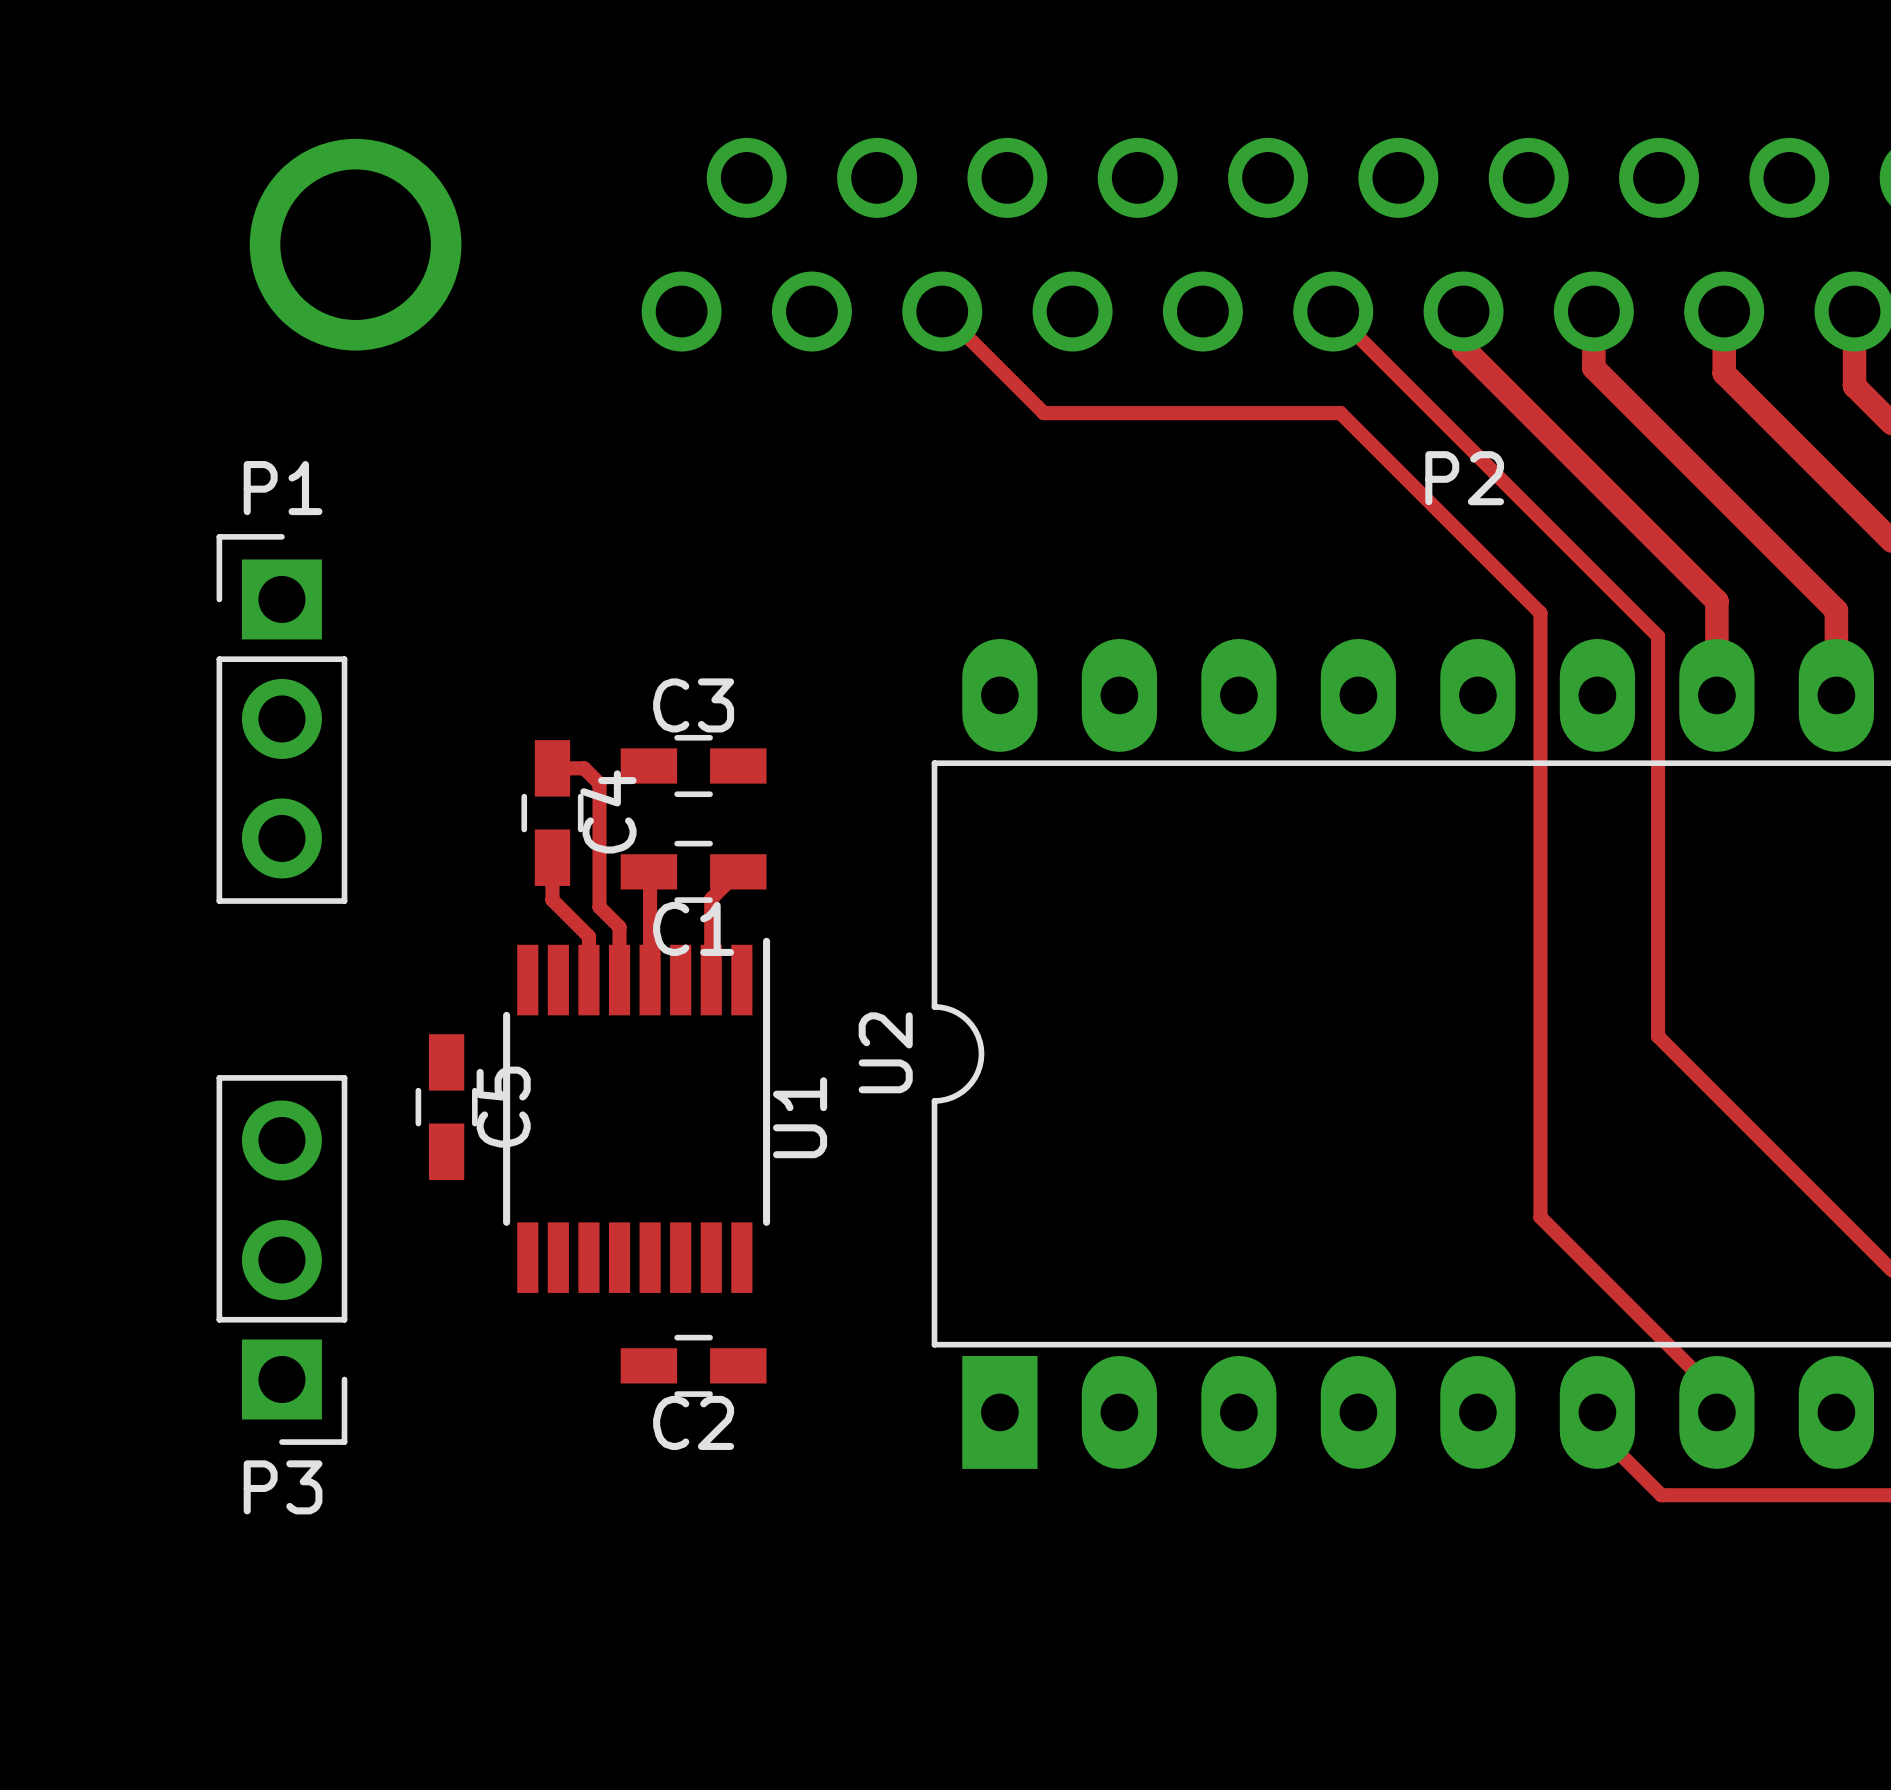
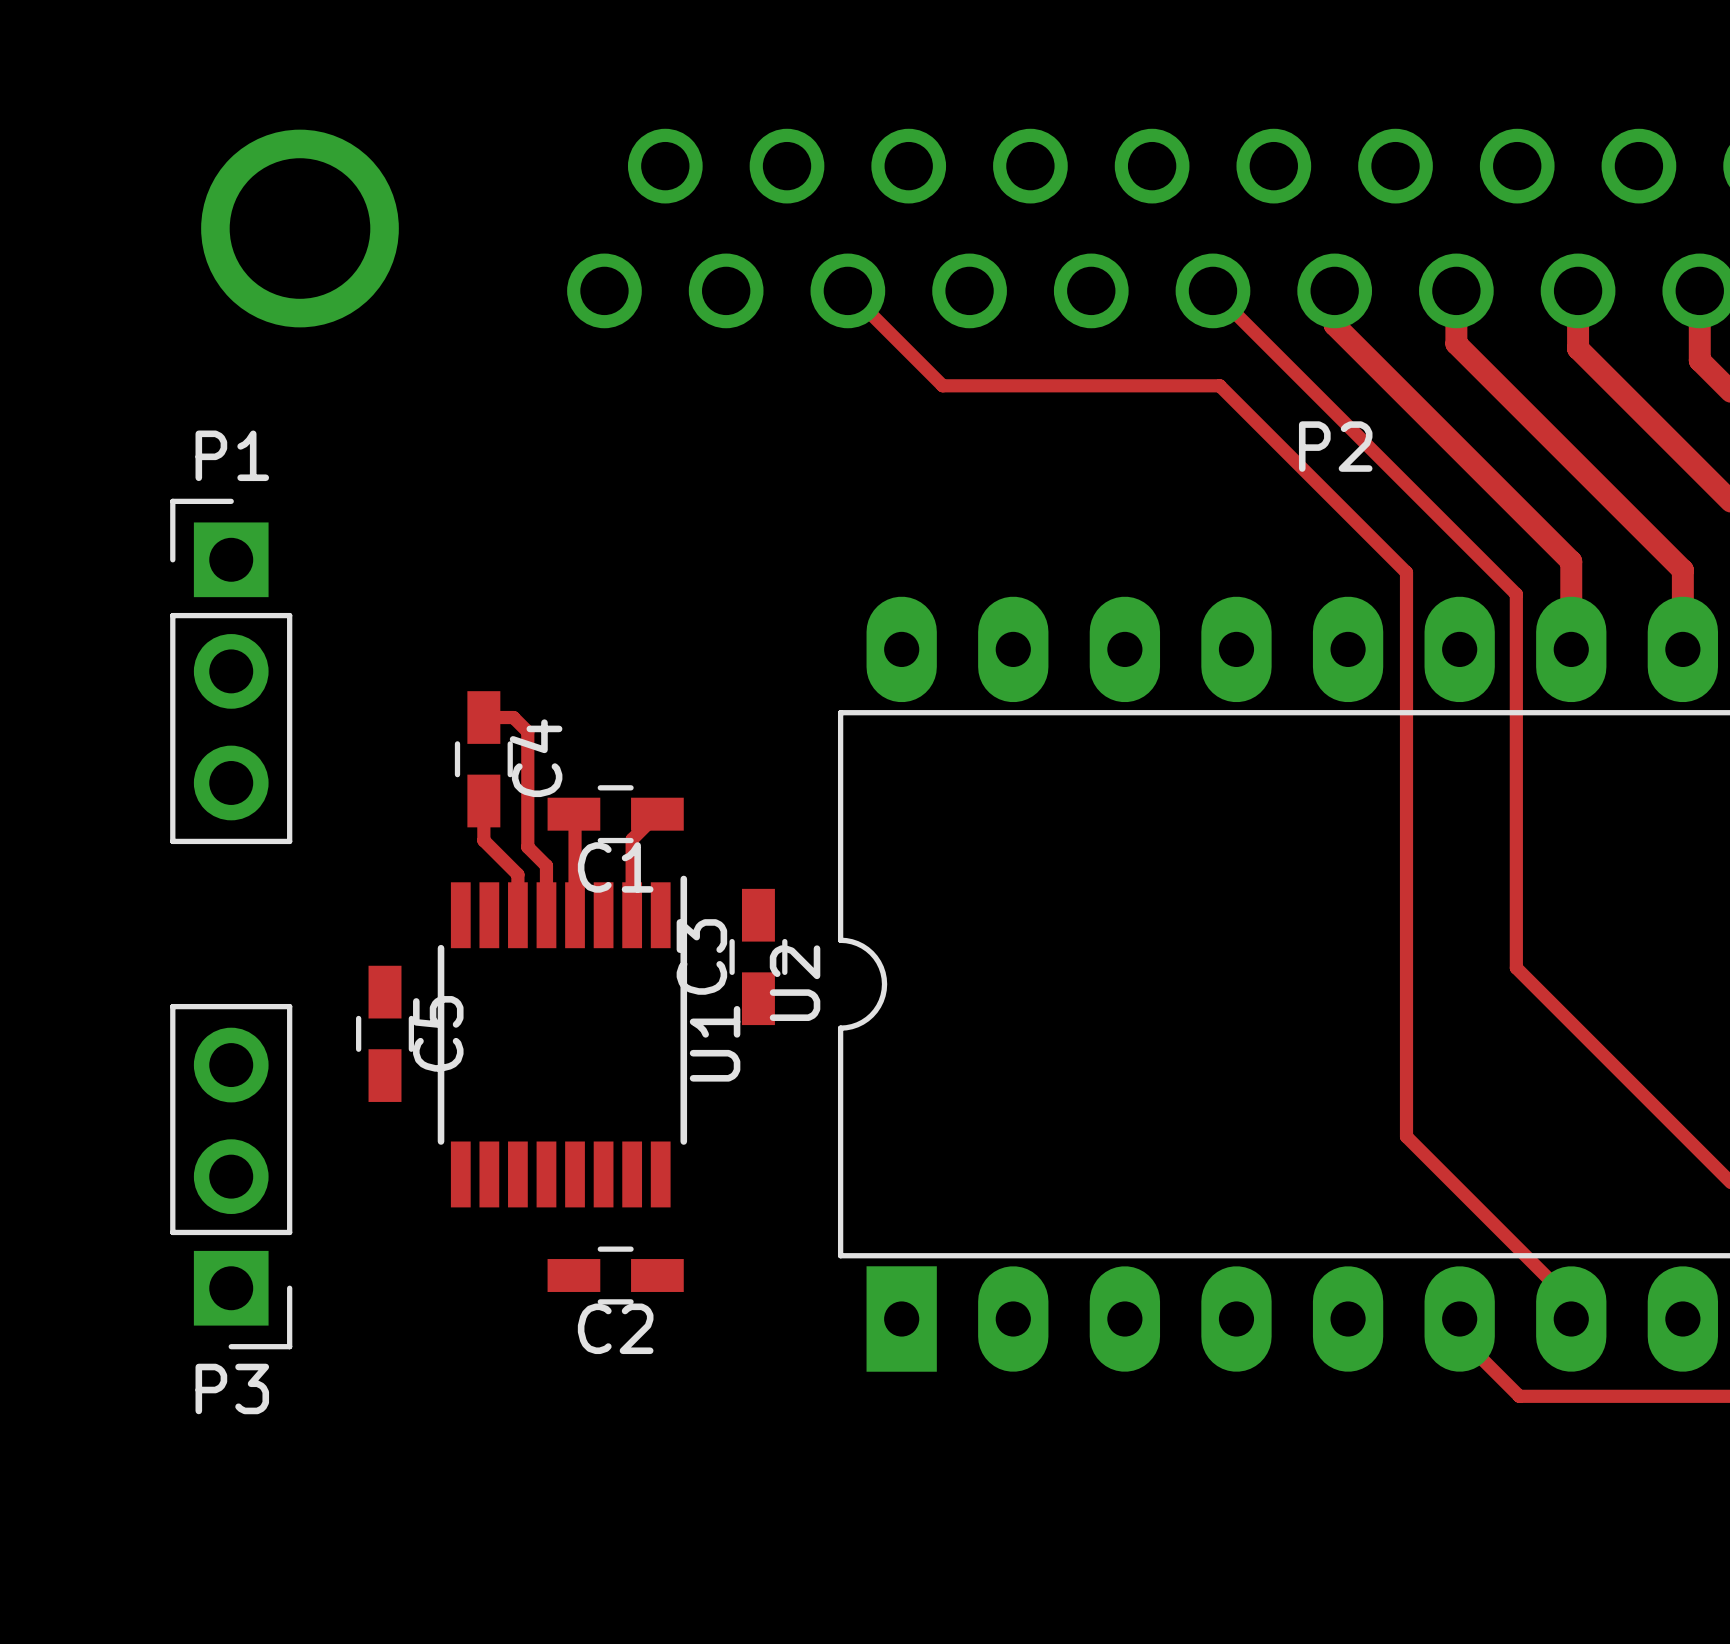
C3 rotation: 0° (693, 765) -> 90° clockwise (758, 956)
C3 position: (693, 765) -> (758, 956)

